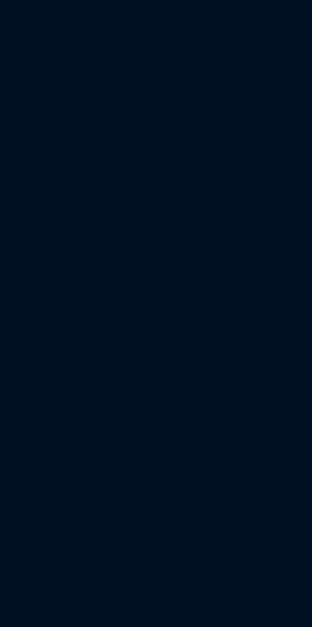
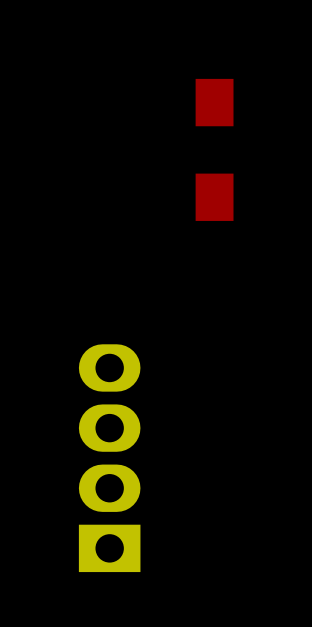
part: none -> (214, 149)
part: none -> (109, 458)

